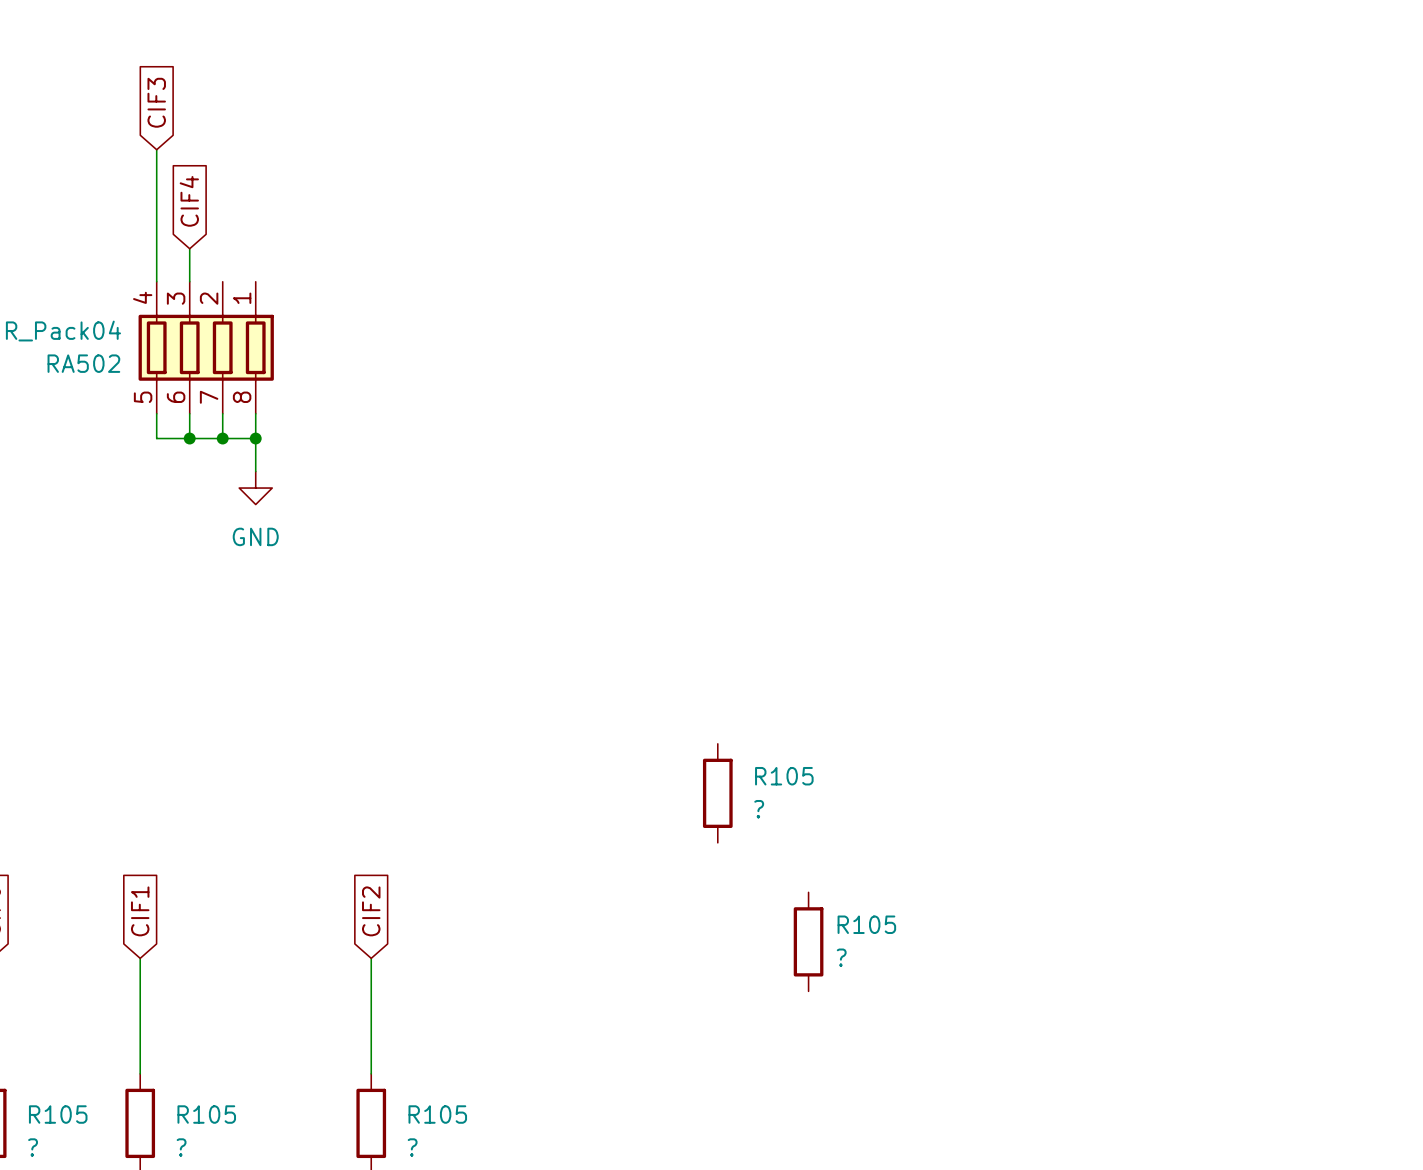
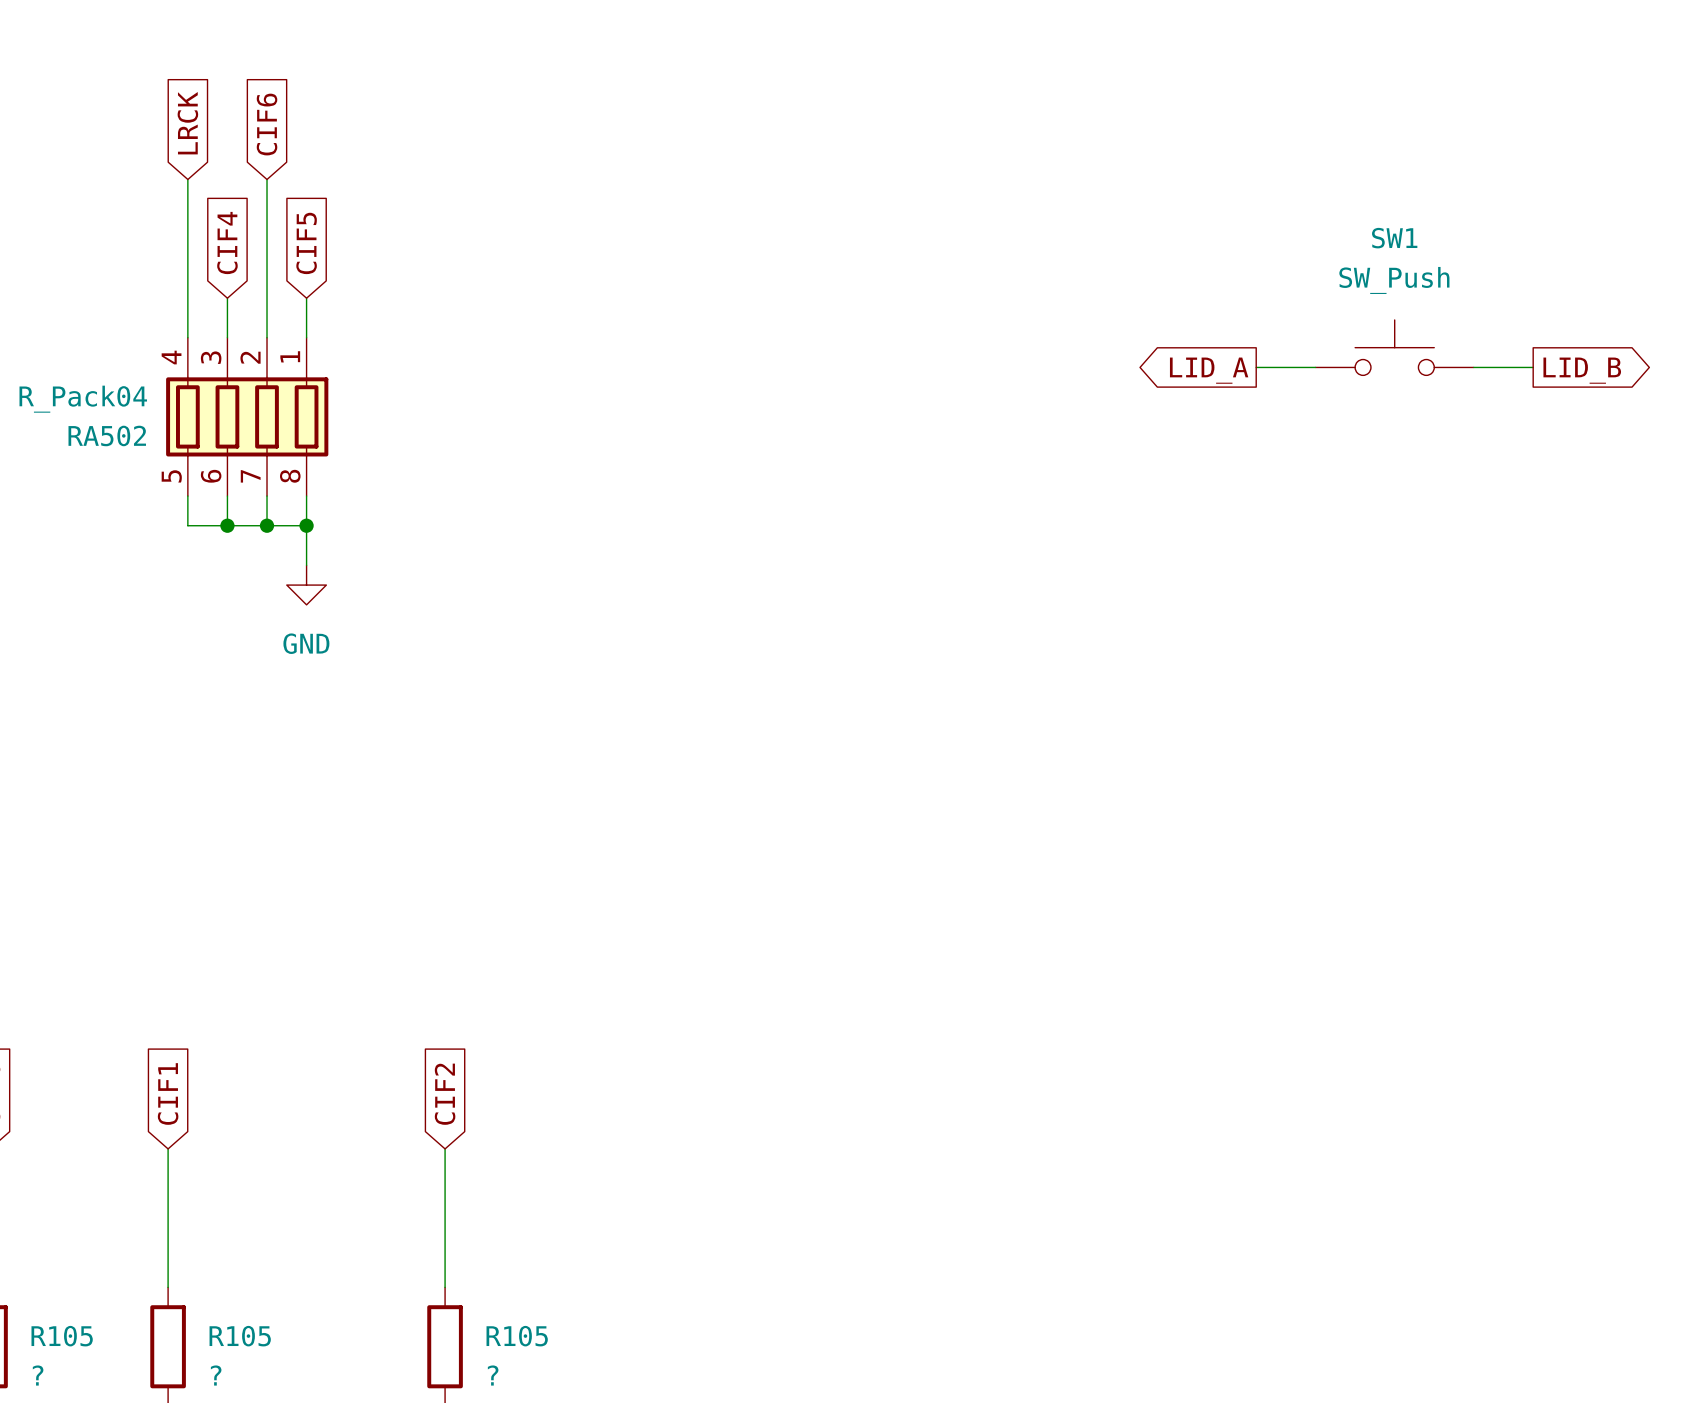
global label: CIF3 (156, 102) -> LRCK (187, 123)
global label: none -> CIF6 (267, 124)
wire: none -> (267, 179) (267, 337)
global label: none -> CIF5 (306, 243)
wire: none -> (306, 298) (306, 337)
SW1: none -> SW_Push (1394, 347)
wire: none -> (1256, 367) (1315, 367)
wire: none -> (1473, 367) (1533, 367)
global label: none -> LID_A (1209, 370)
global label: none -> LID_B (1582, 370)
R105: ? (717, 793) -> none
R105: ? (808, 941) -> none

